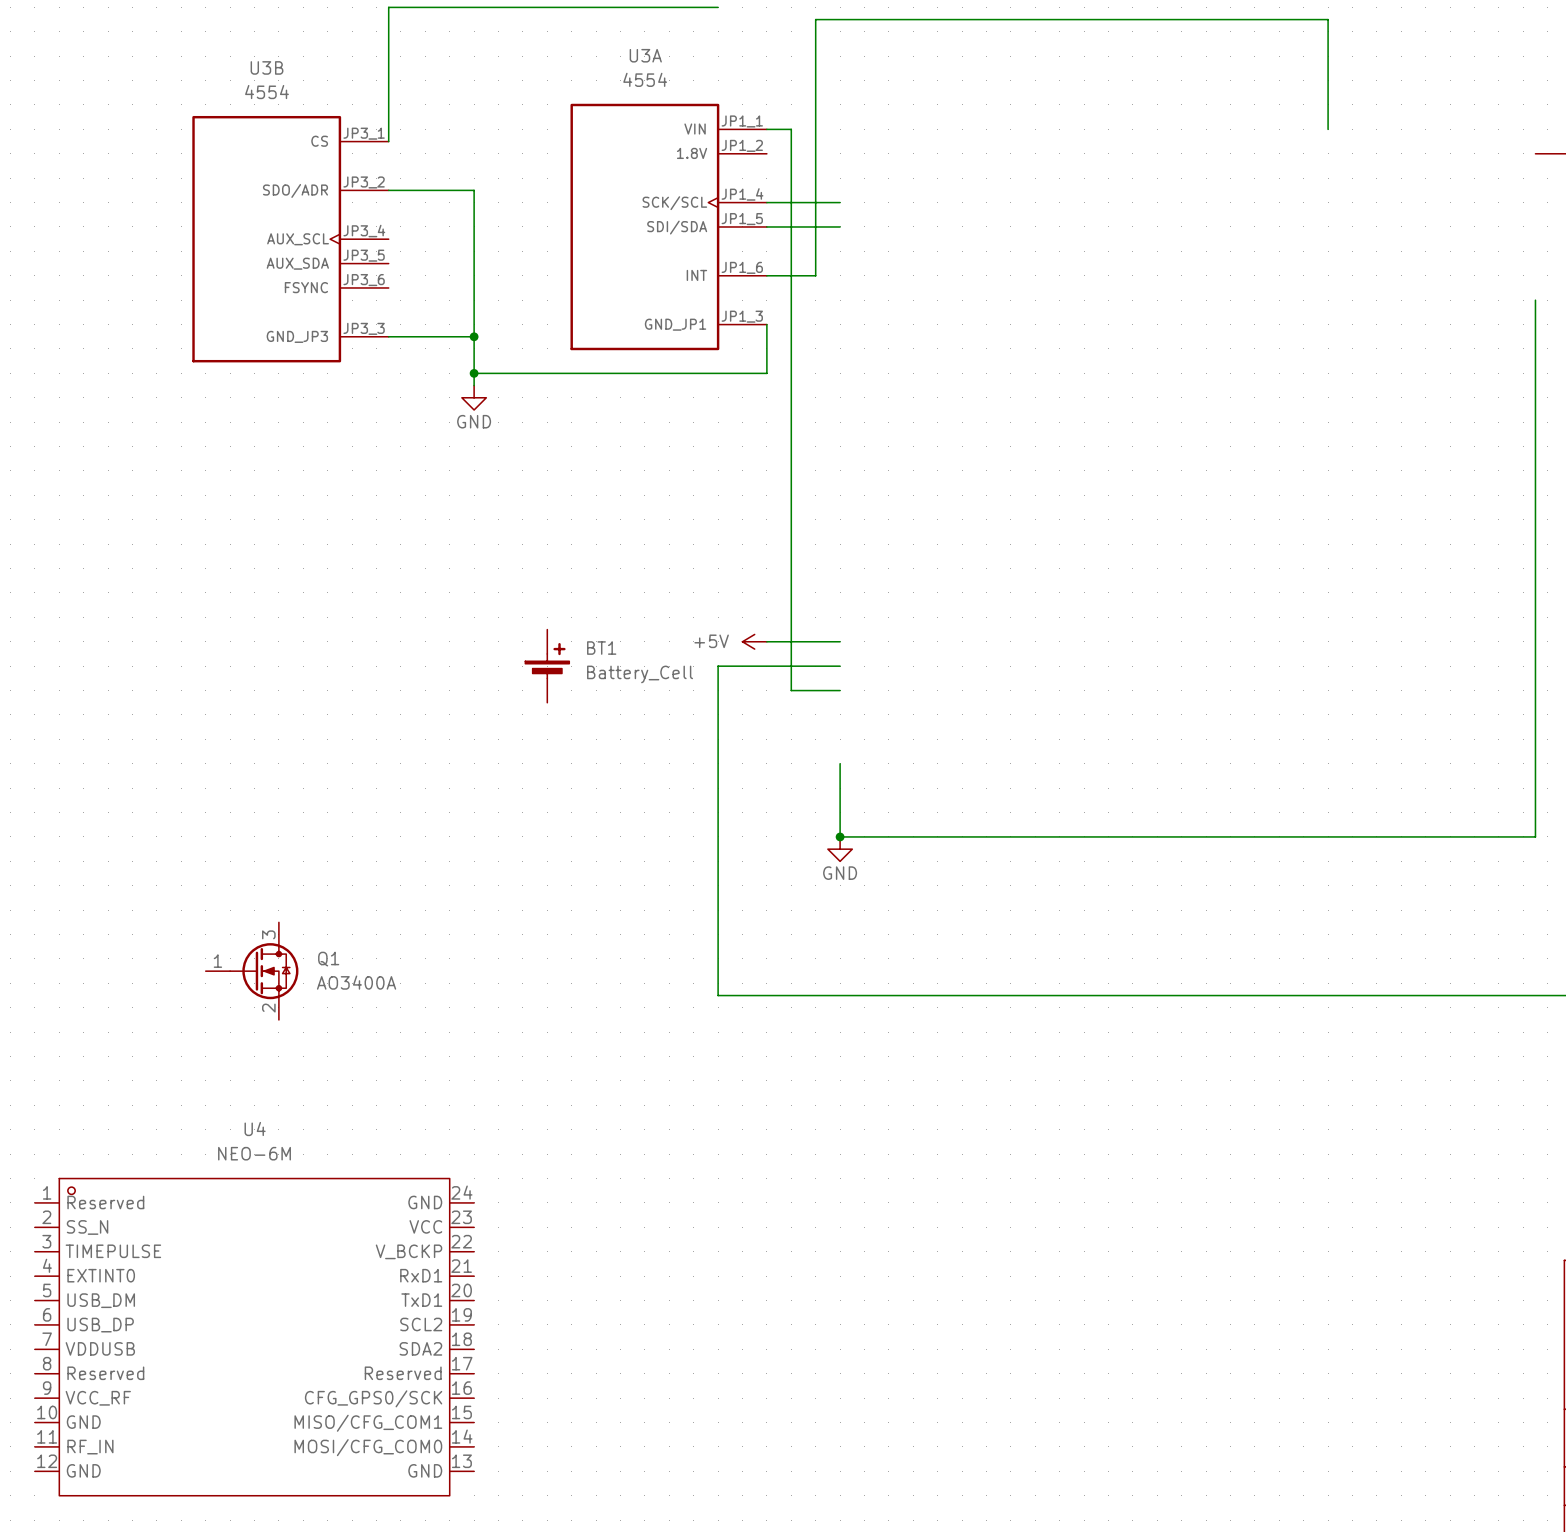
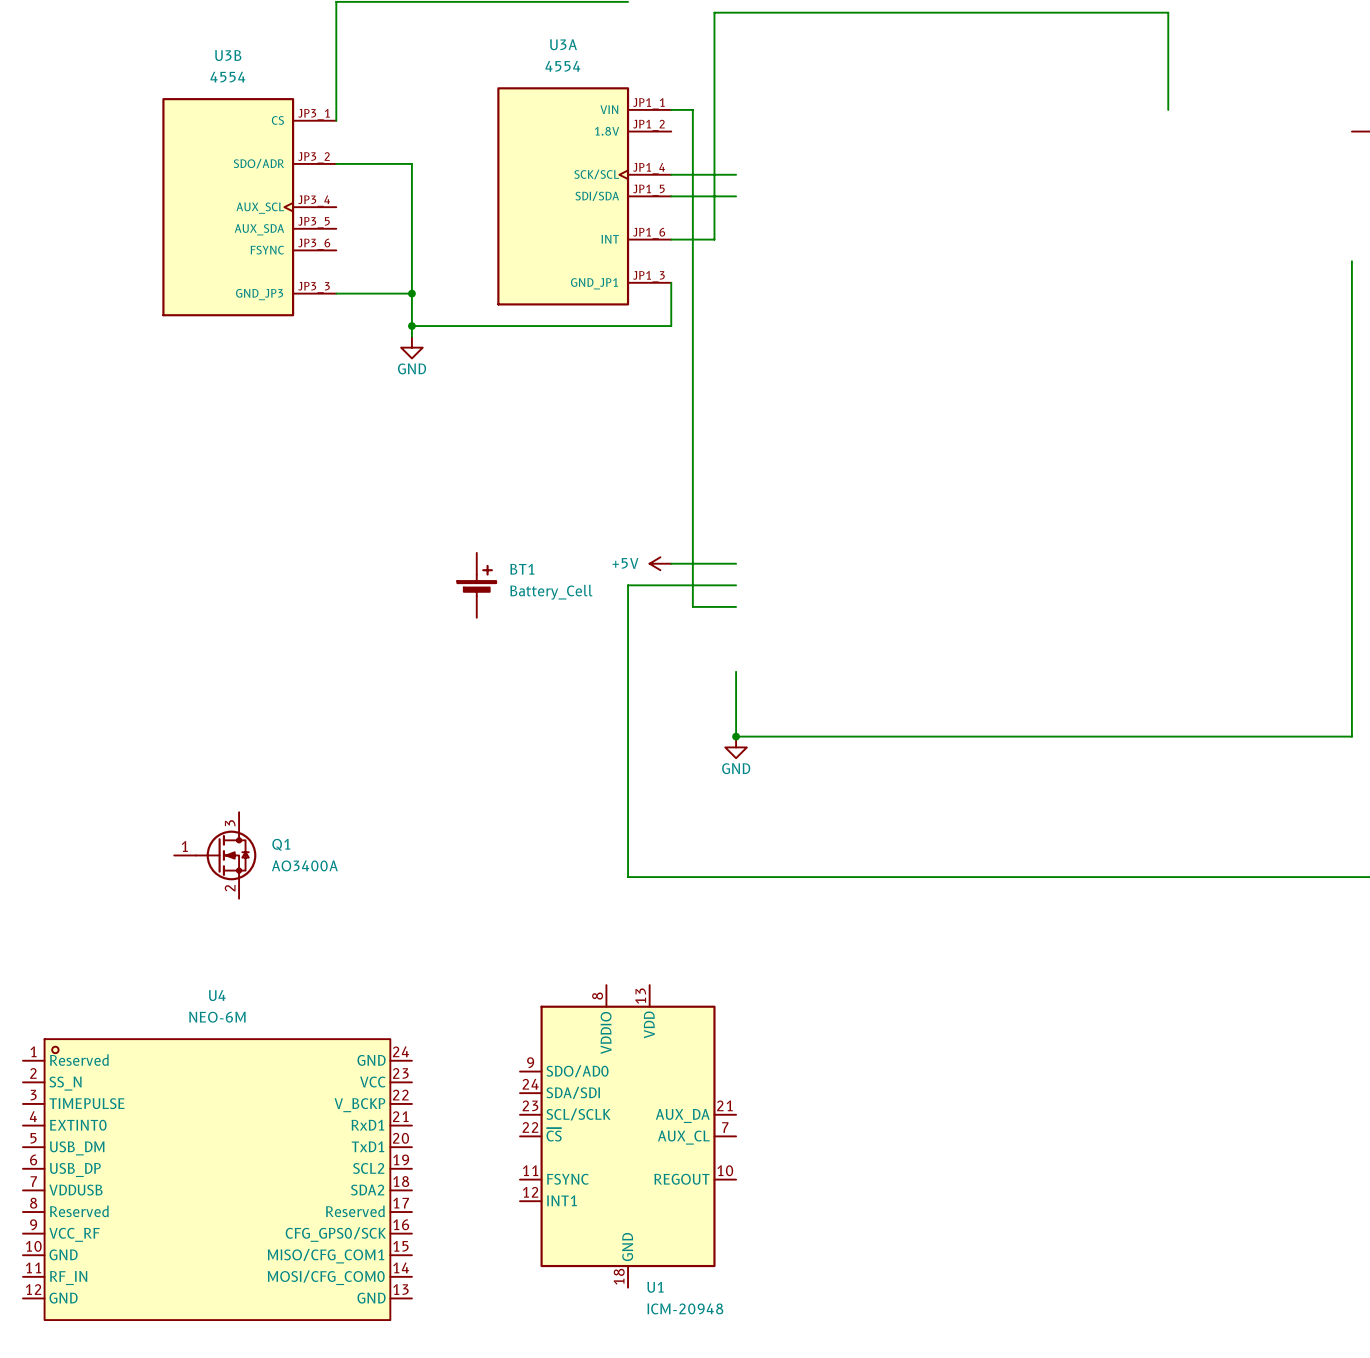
U1: none -> ICM-20948 (628, 1136)

